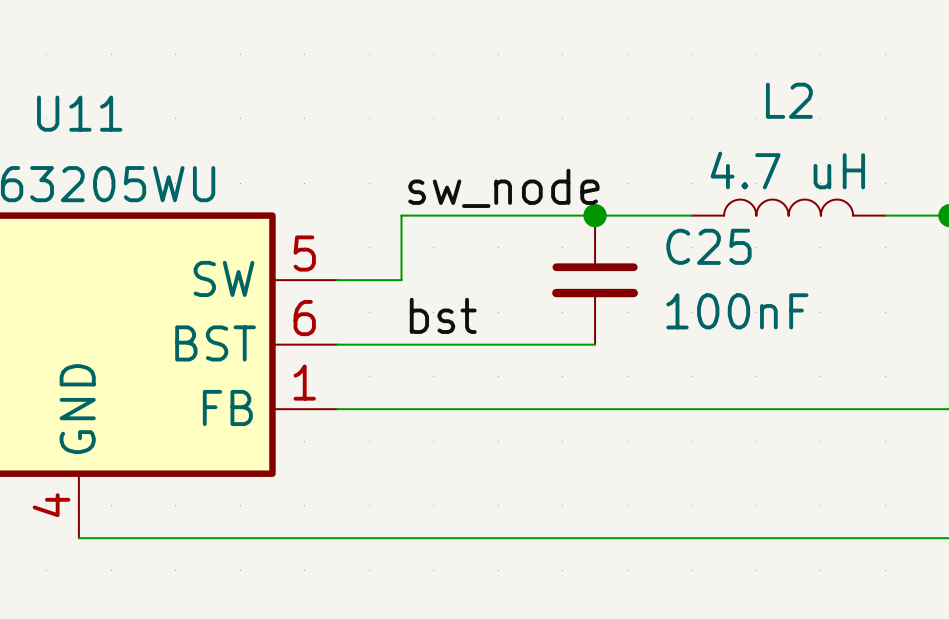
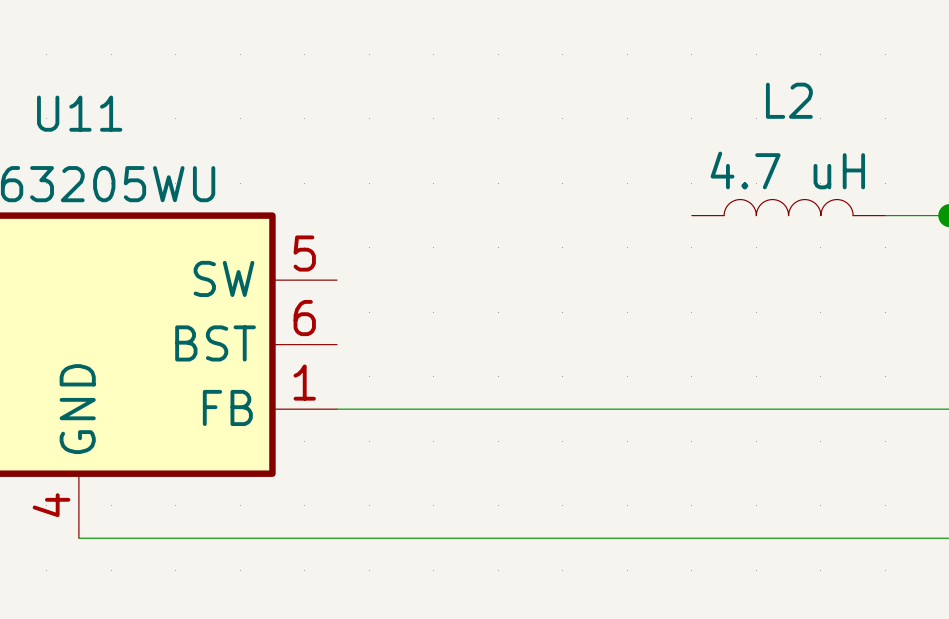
label: sw_node (503, 188) -> none
junction: (595, 215) -> none
wire: (691, 215) (401, 215) (401, 280) (336, 280) -> none
C25: 100nF (595, 280) -> none
label: bst (443, 315) -> none
wire: (336, 344) (595, 344) -> none

